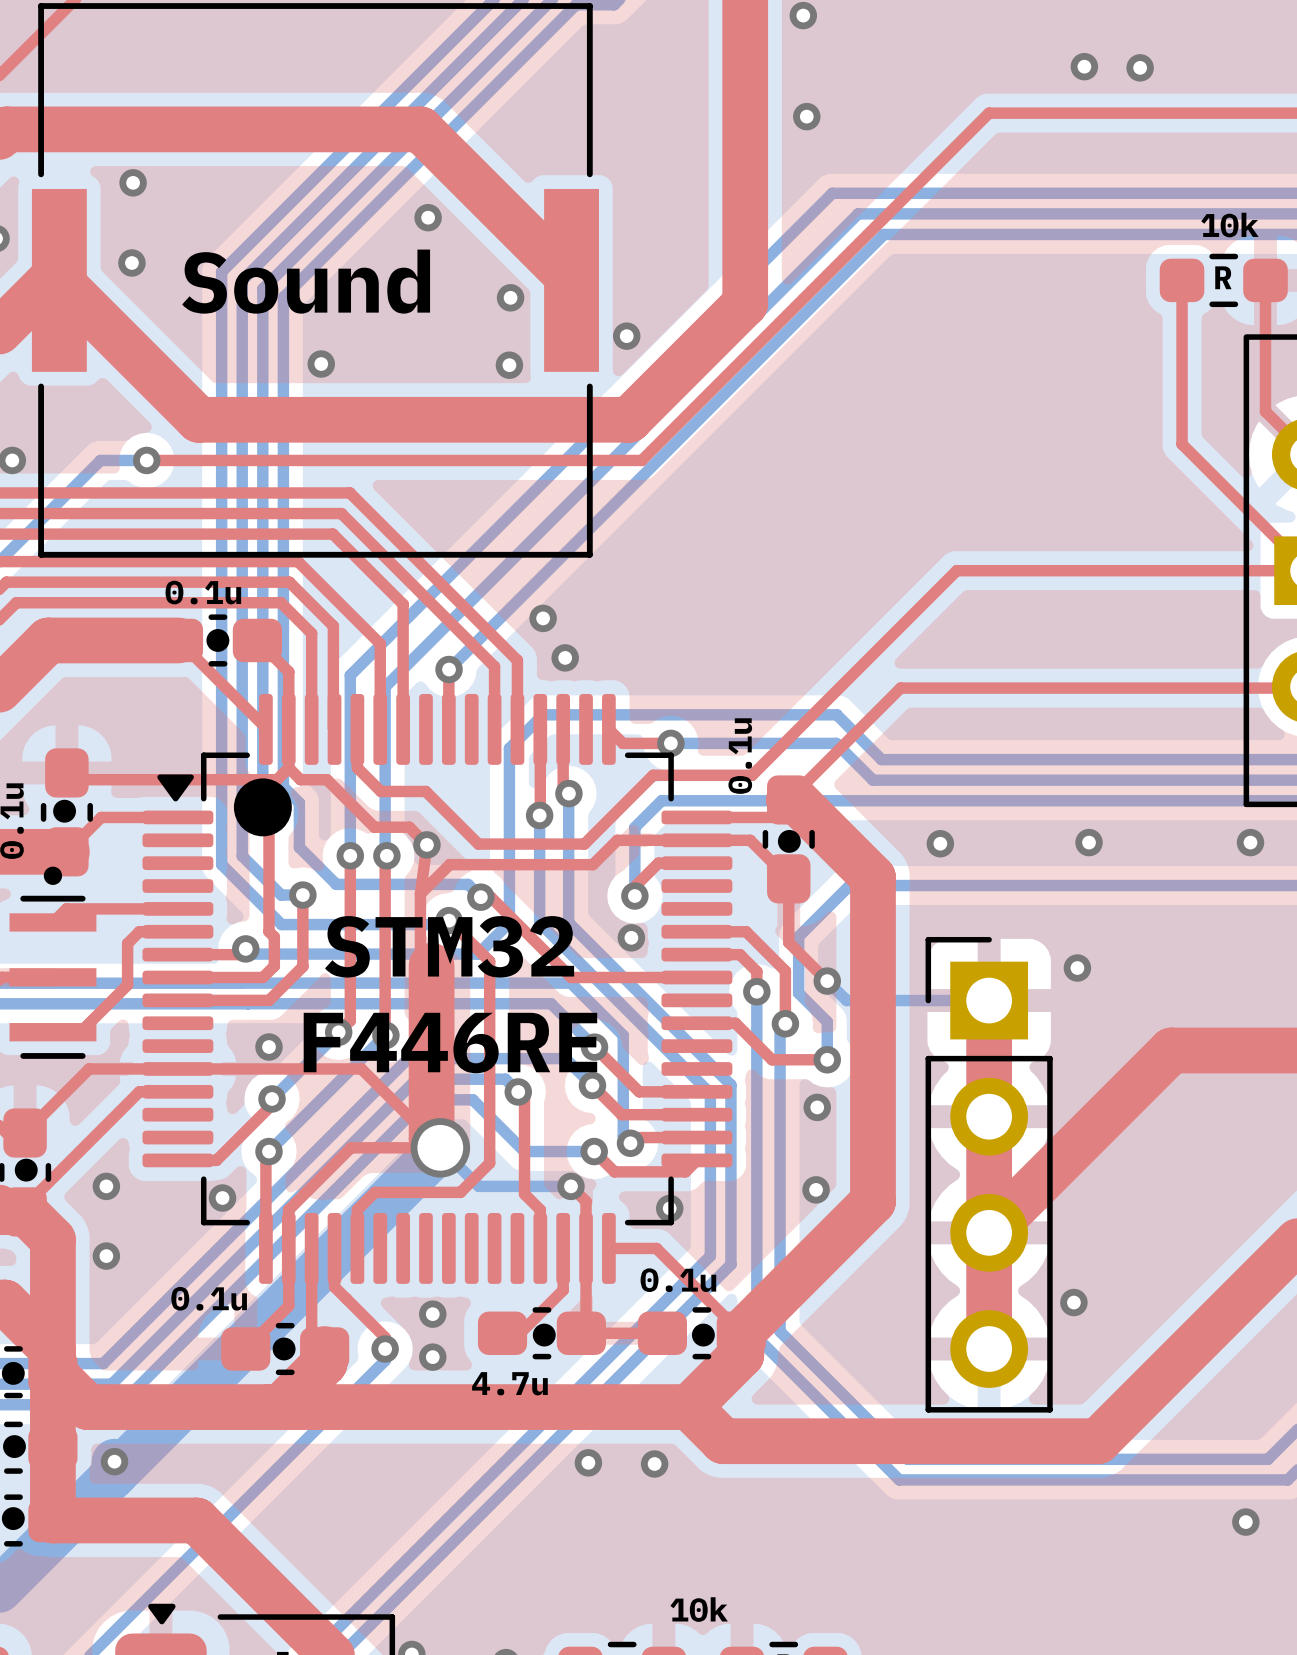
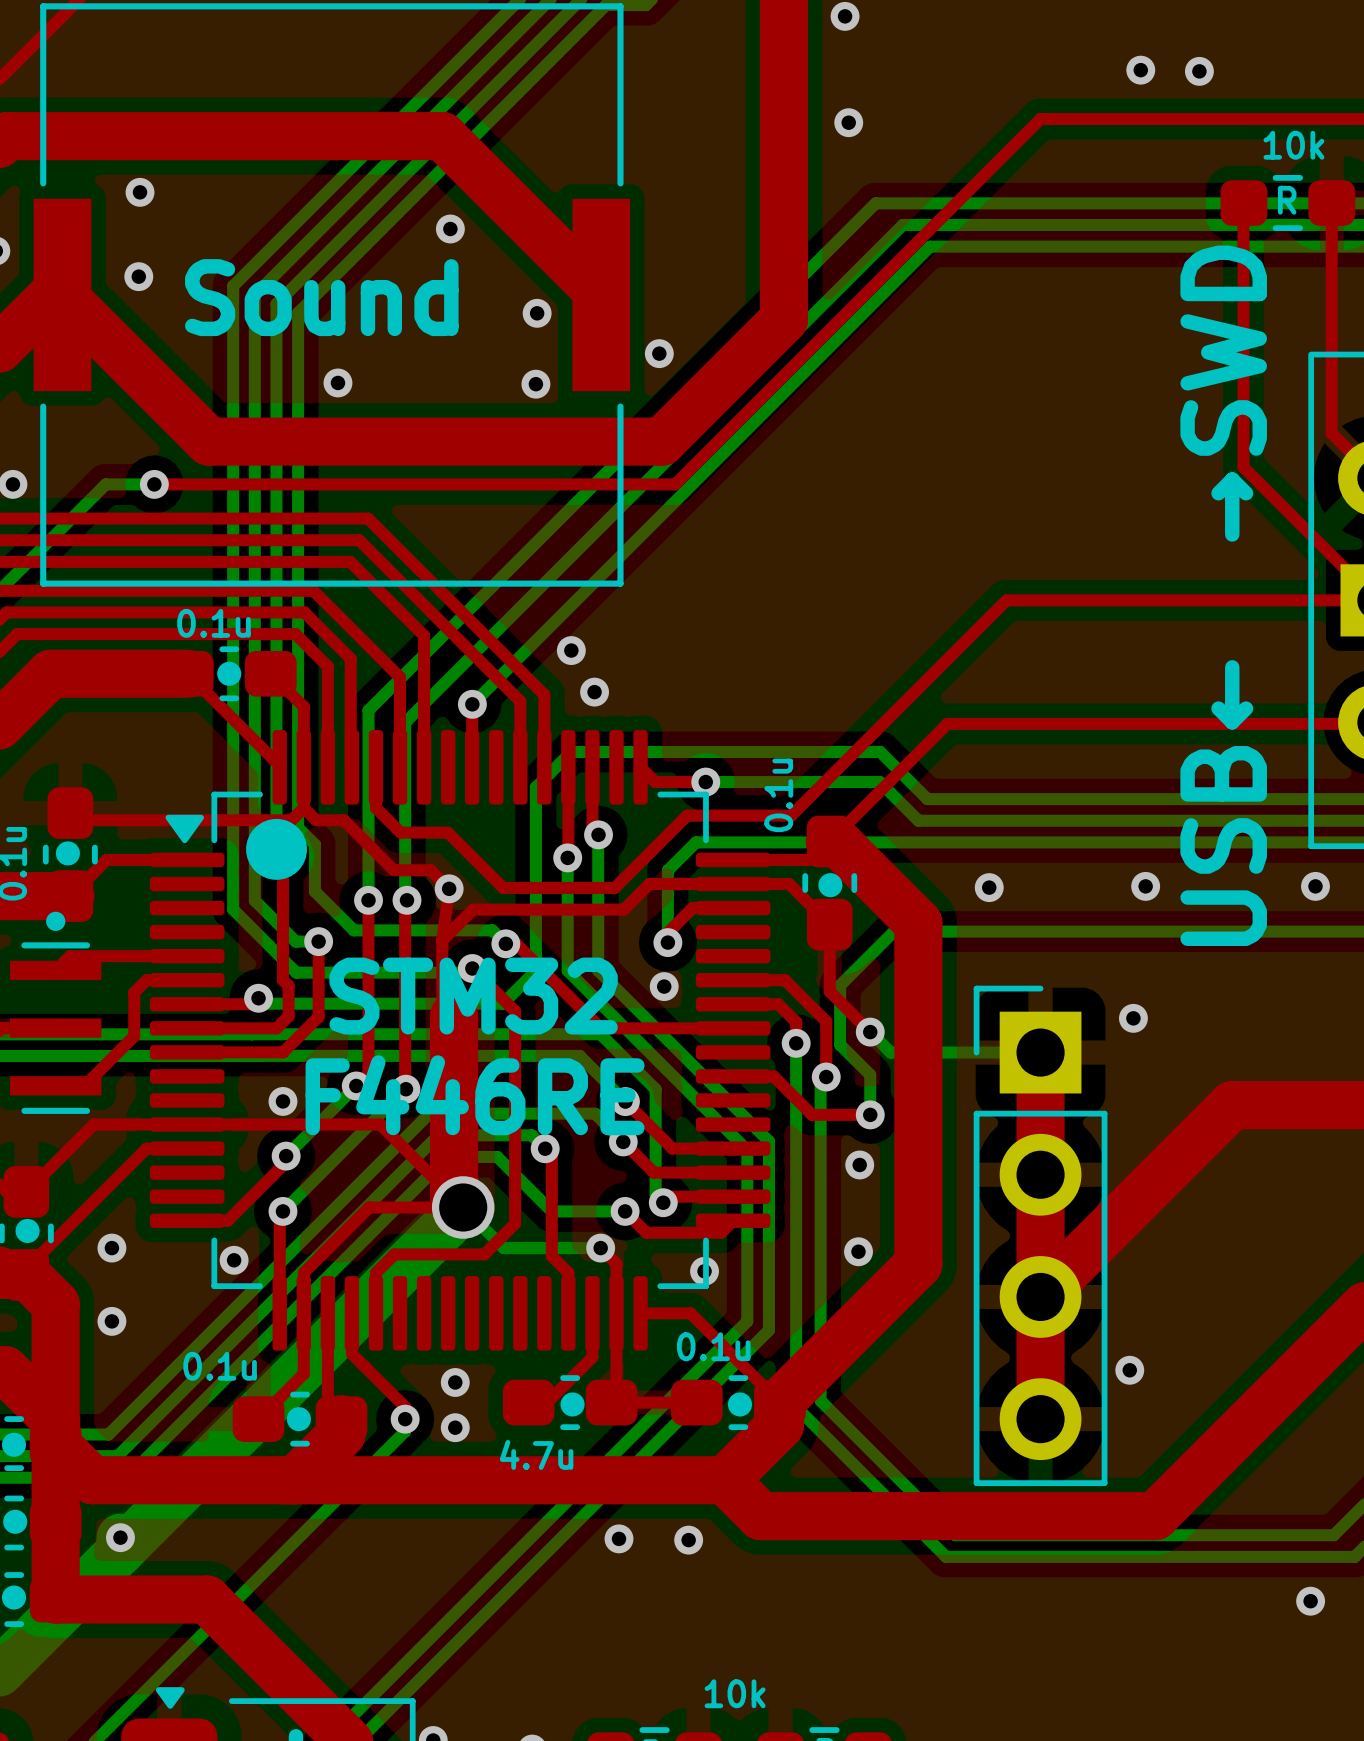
top track: none -> (1243, 203) (1243, 294)
text position: 10k (1229, 225) -> 10k (1293, 145)
text position: R (1223, 277) -> R (1287, 200)
part position: (1223, 280) -> (1287, 203)
top track: (1265, 280) (1265, 411) -> (1331, 203) (1331, 433)
text: none -> USB← →SWD (1223, 595)

